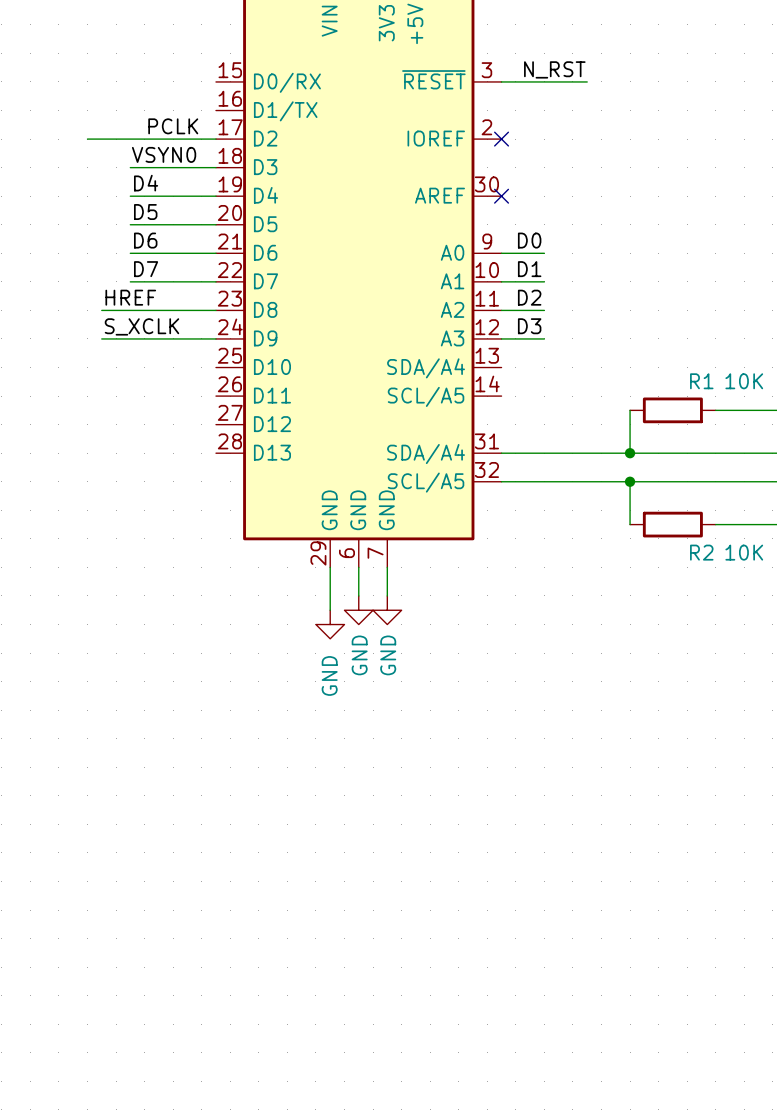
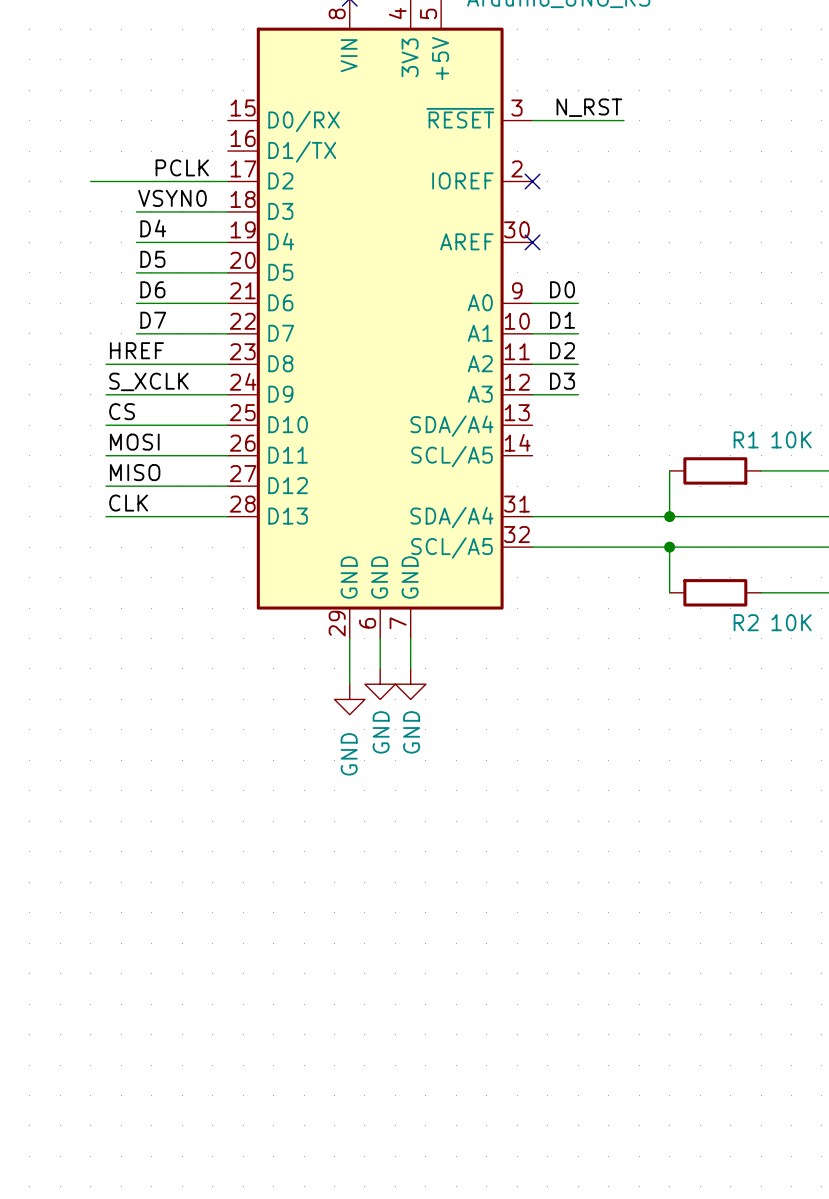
label: none -> CS (122, 411)
wire: none -> (105, 425) (227, 425)
label: none -> MOSI (134, 442)
wire: none -> (105, 455) (227, 455)
label: none -> MISO (135, 472)
wire: none -> (105, 486) (227, 486)
label: none -> CLK (128, 503)
wire: none -> (105, 516) (227, 516)

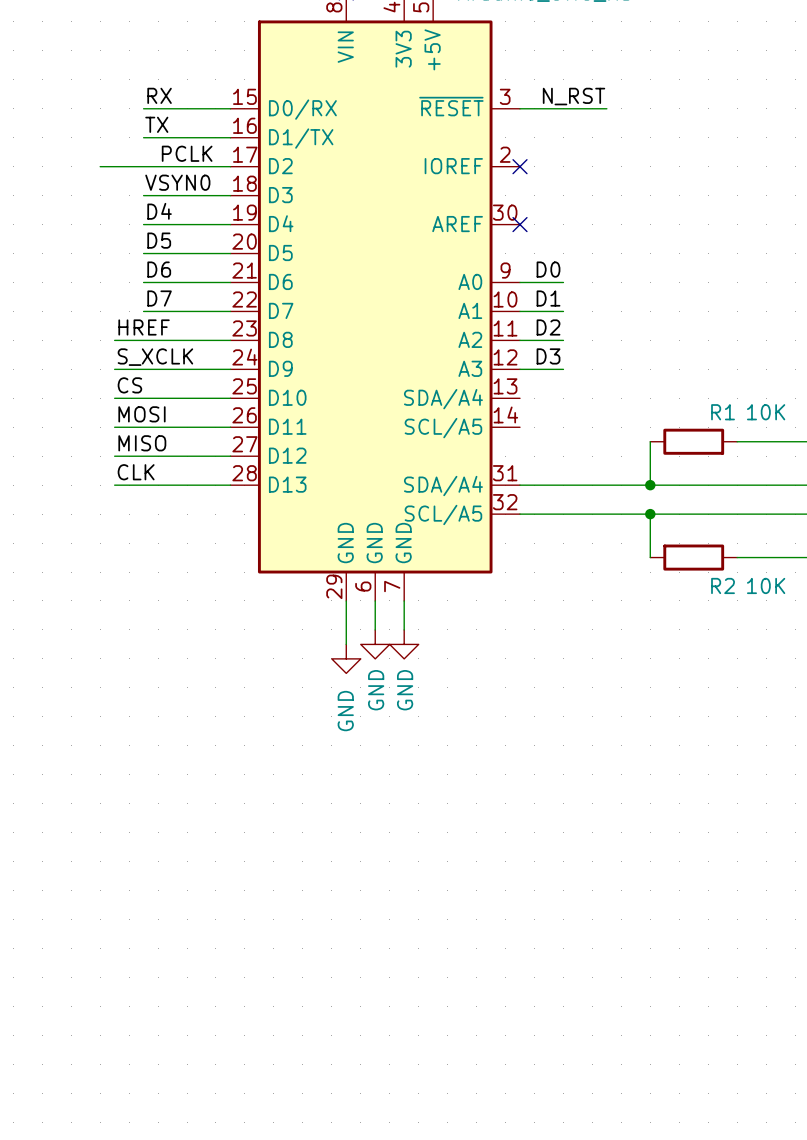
label: none -> RX (159, 95)
wire: none -> (143, 108) (230, 108)
label: none -> TX (156, 124)
wire: none -> (143, 137) (230, 137)

